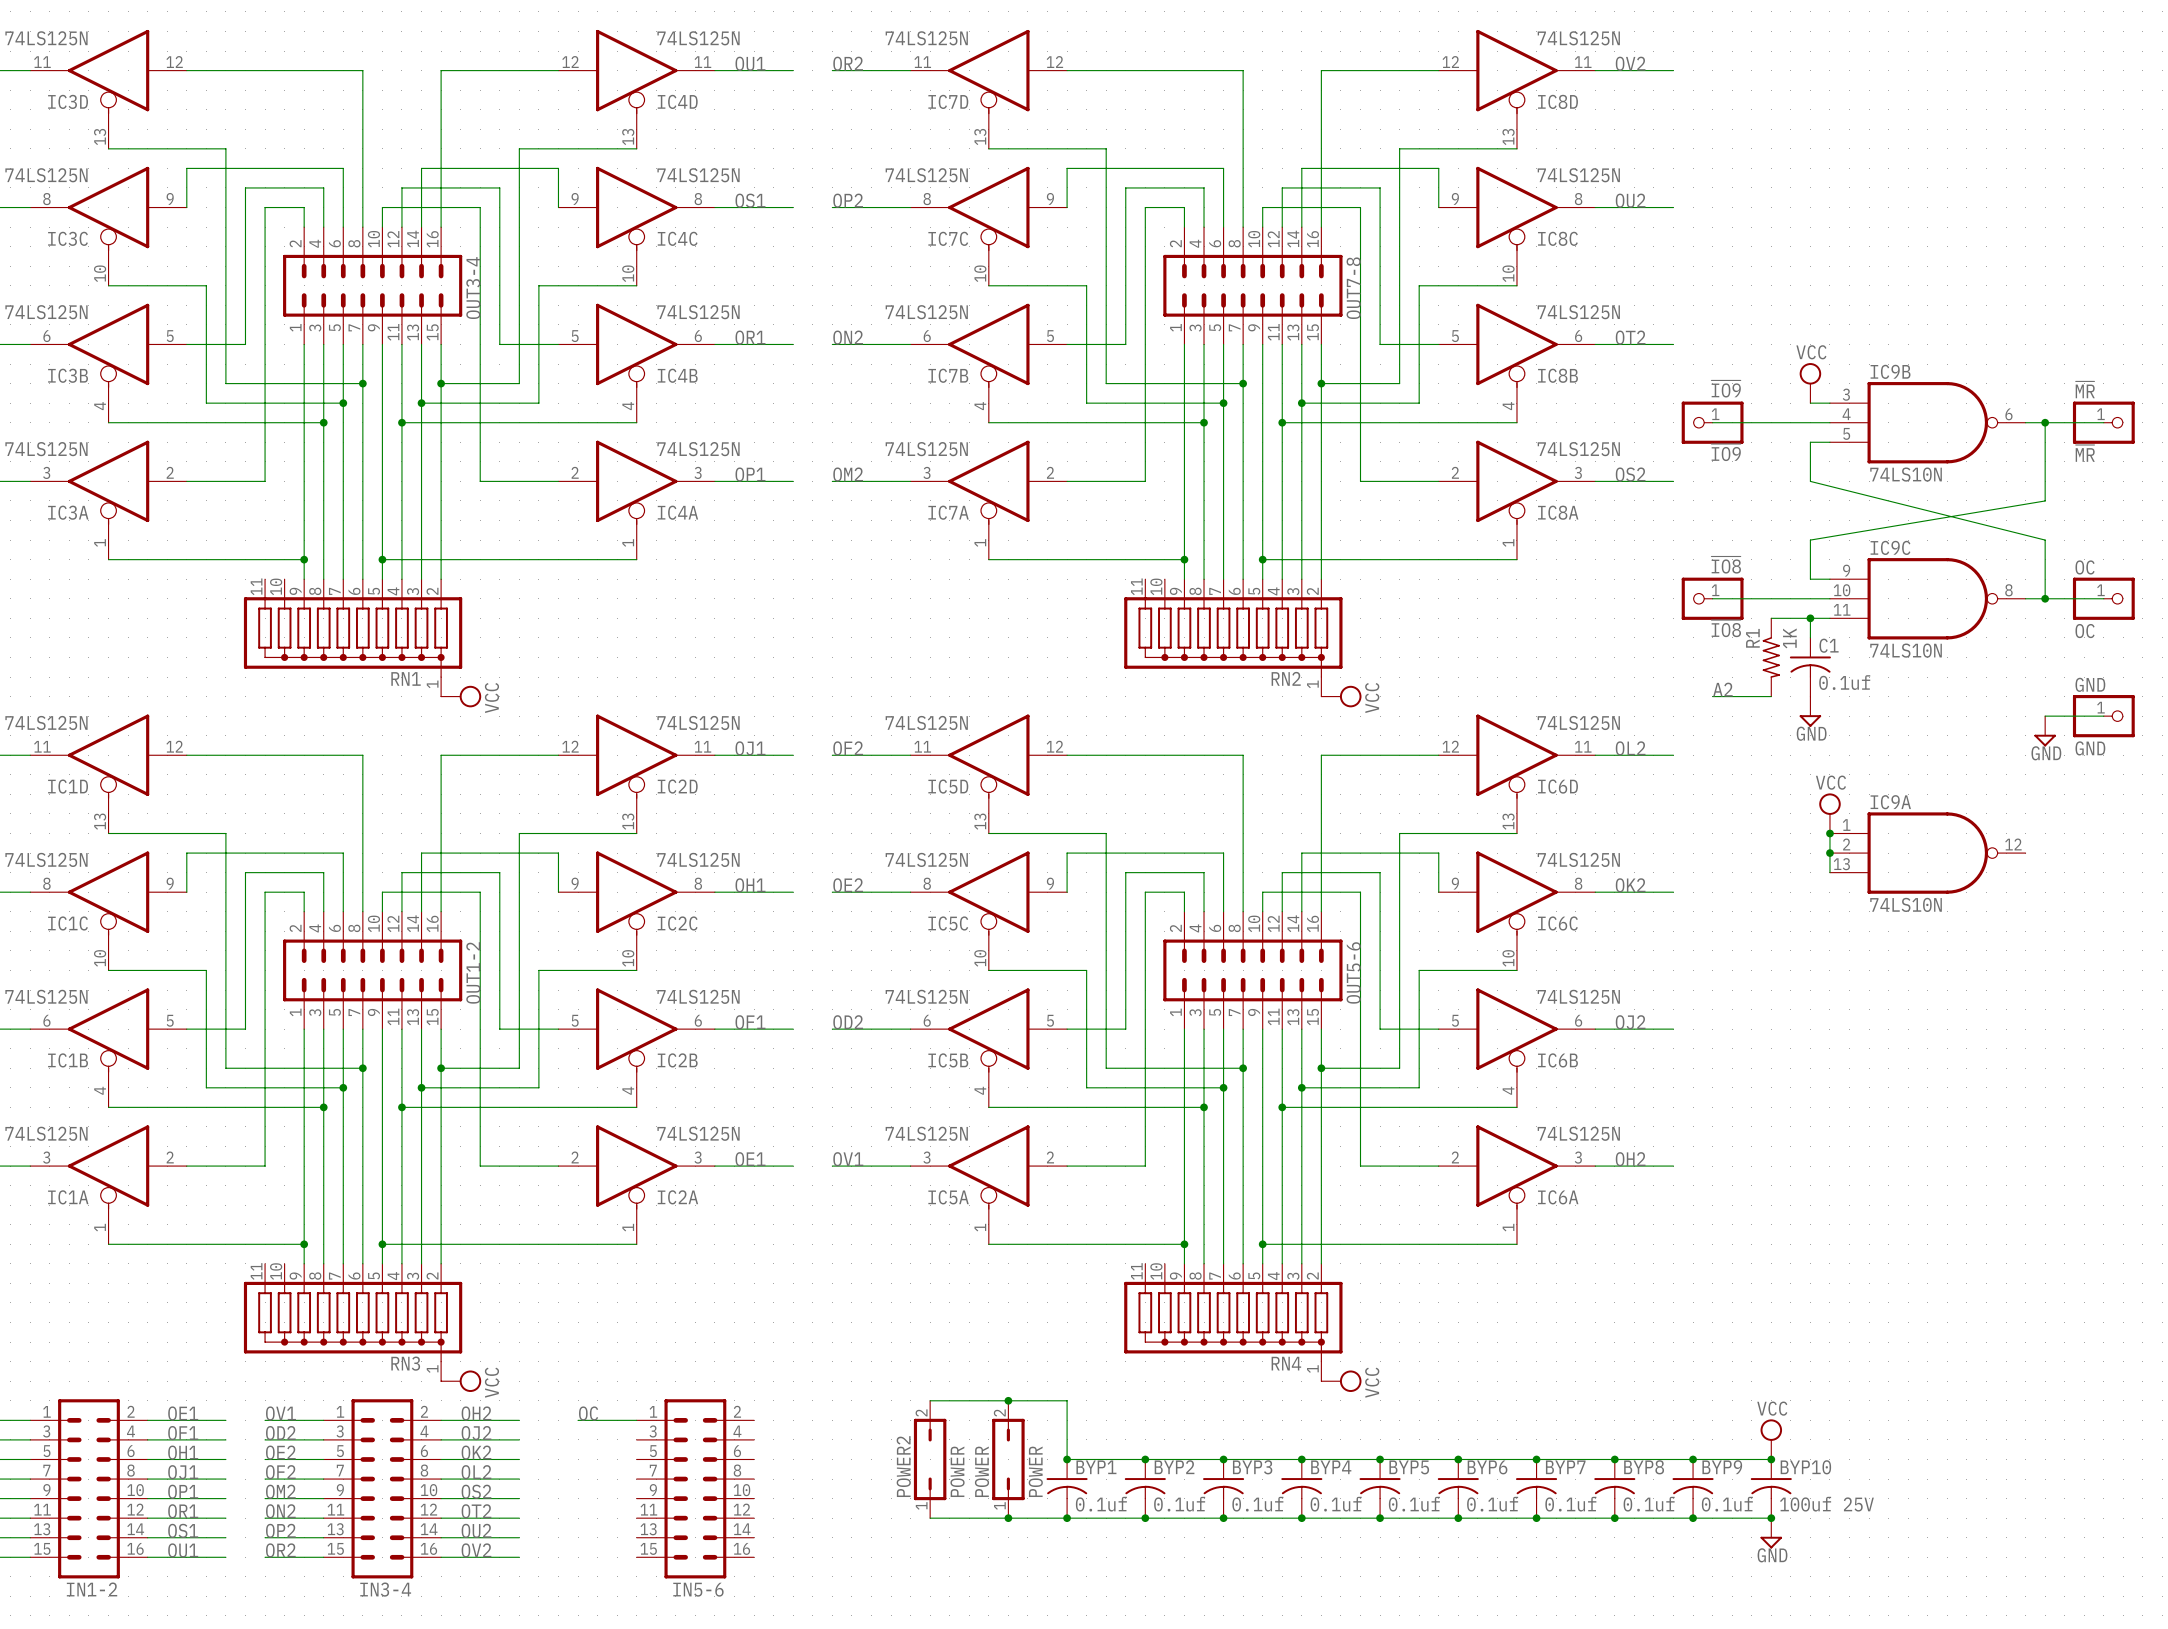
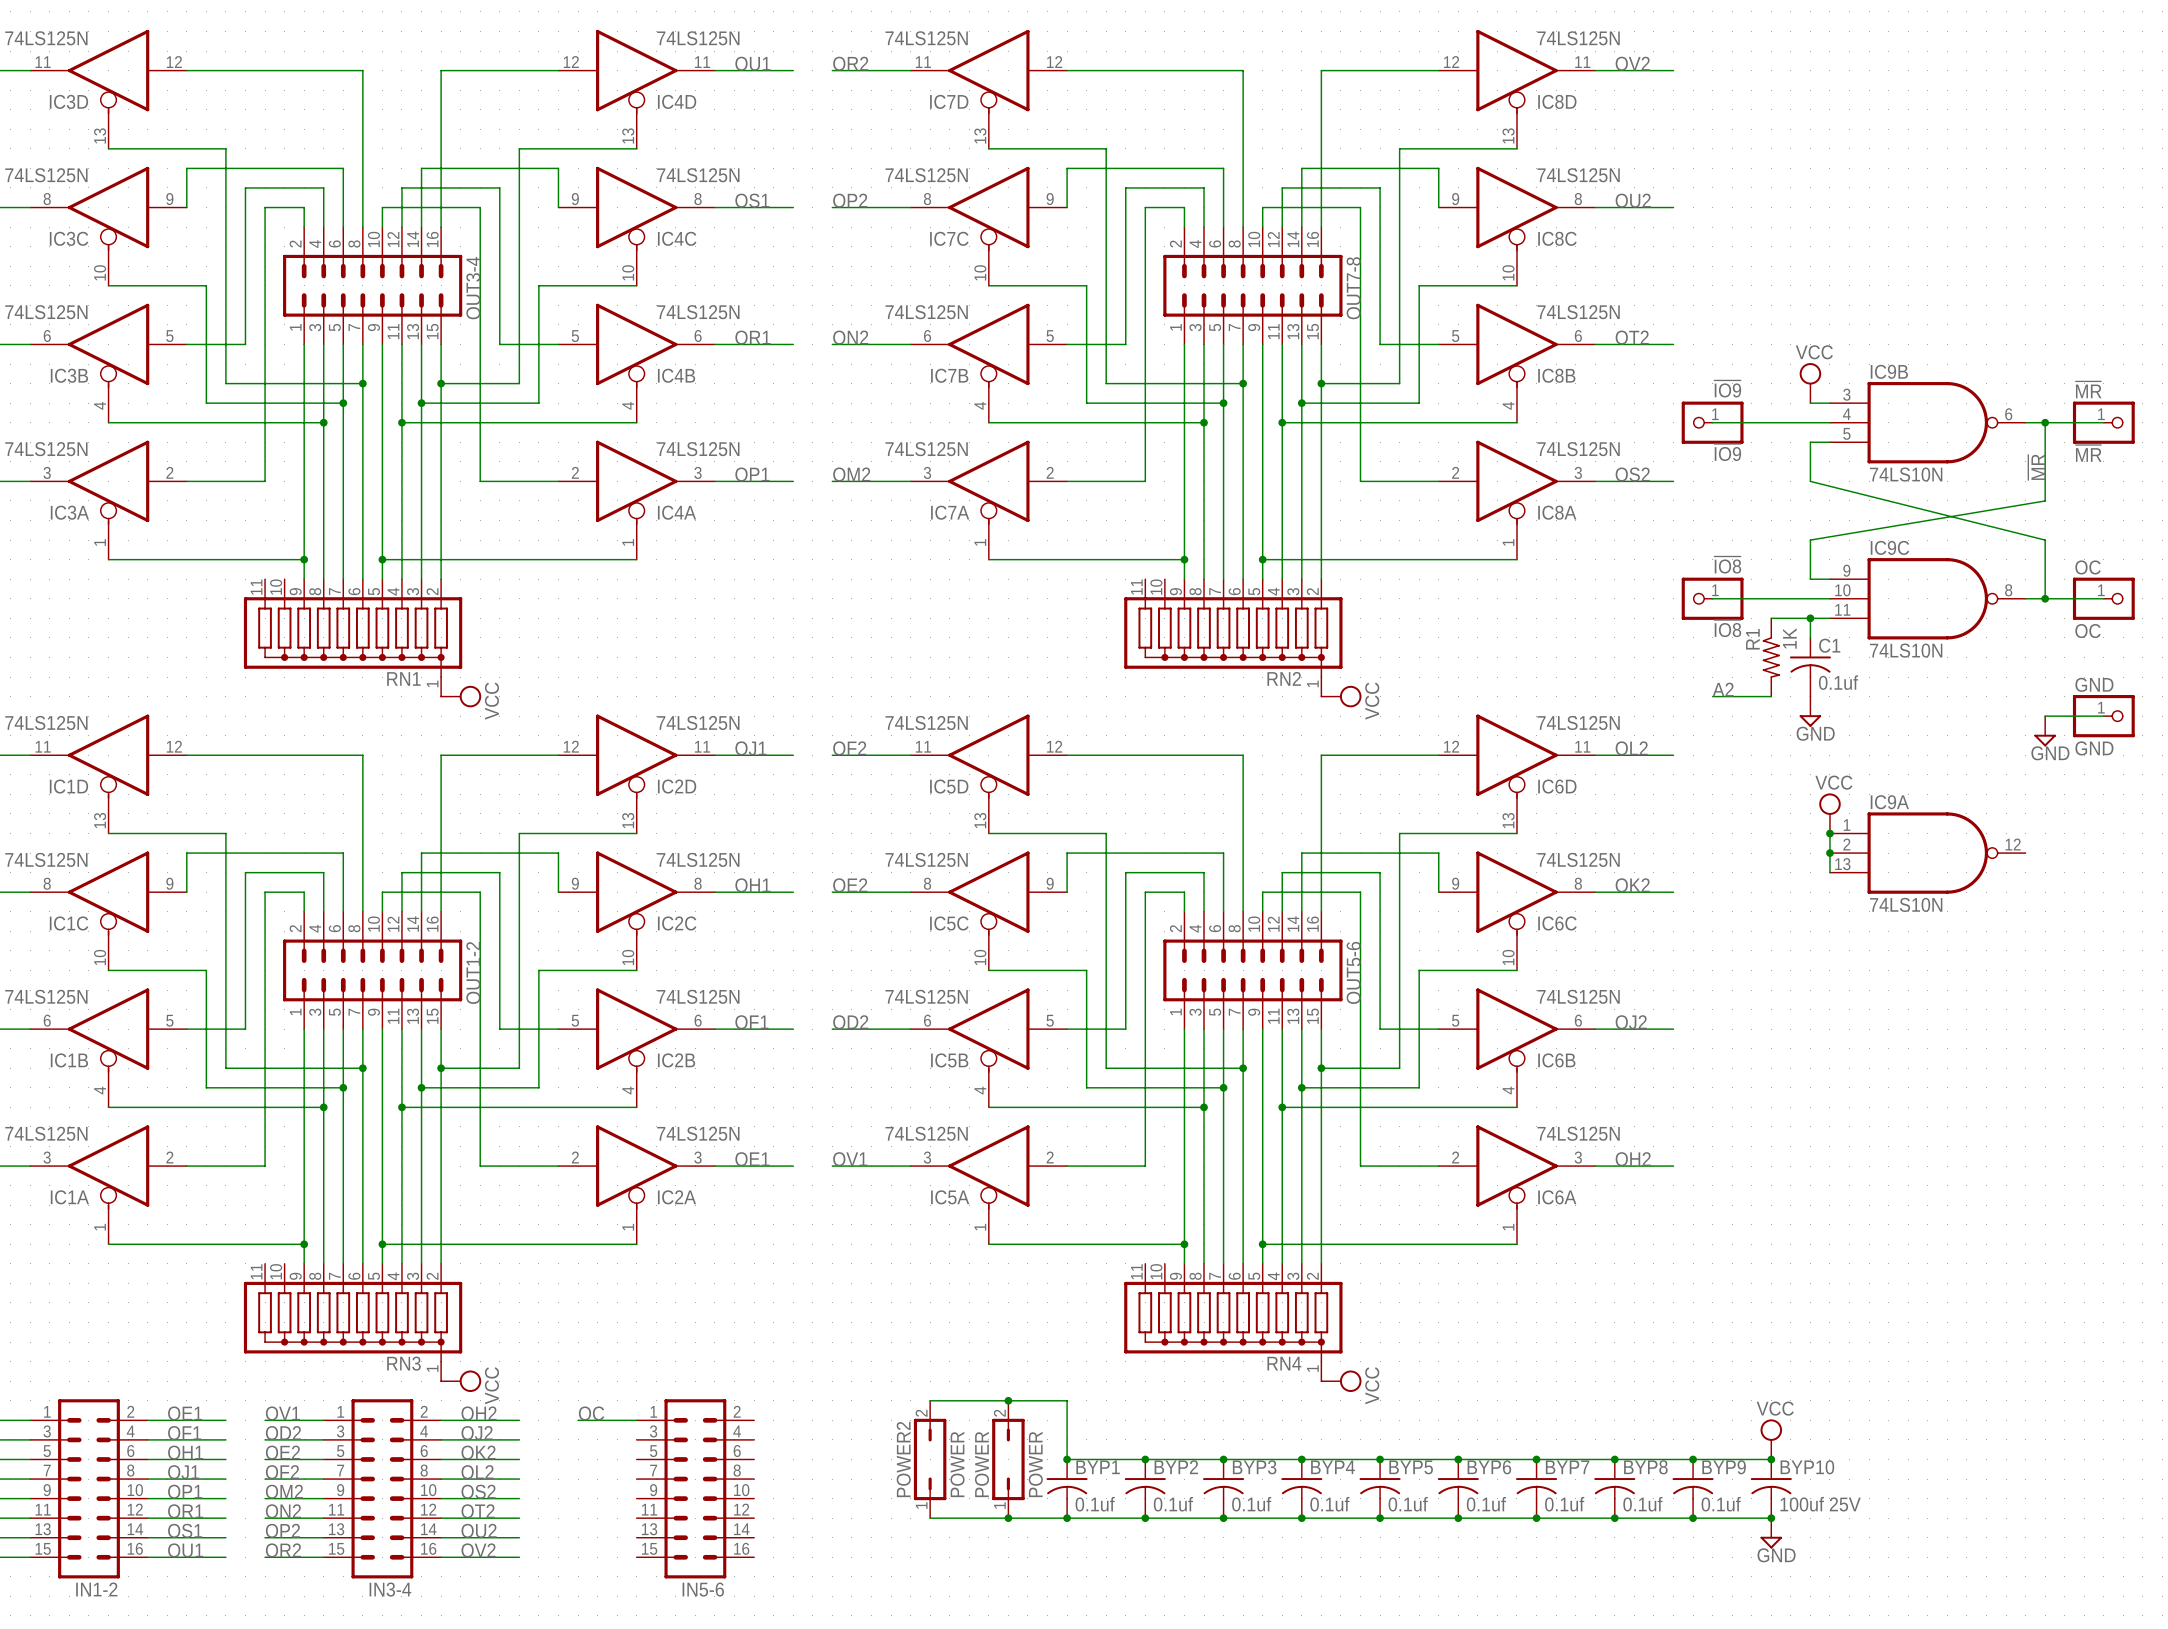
label: none -> ~{MR} (2036, 467)

